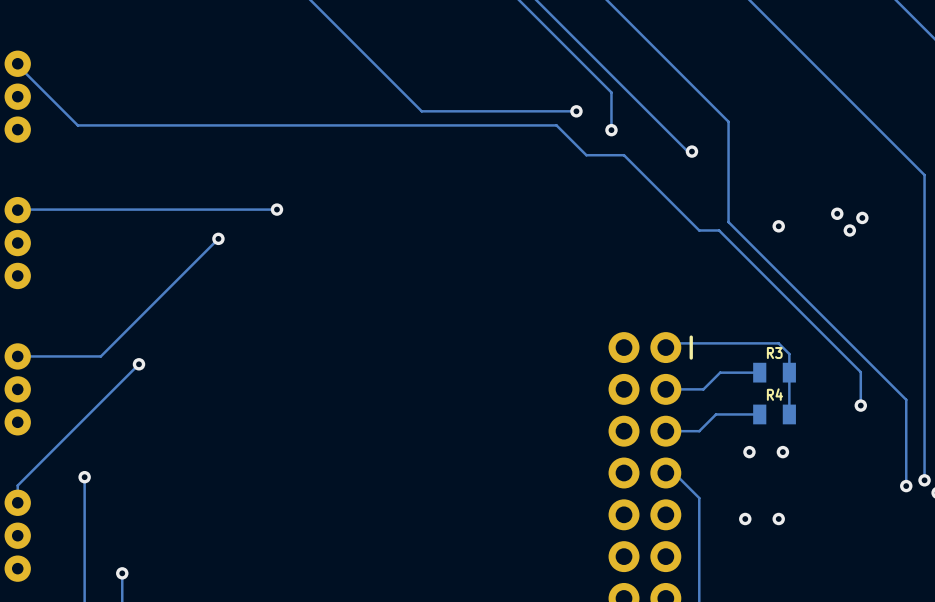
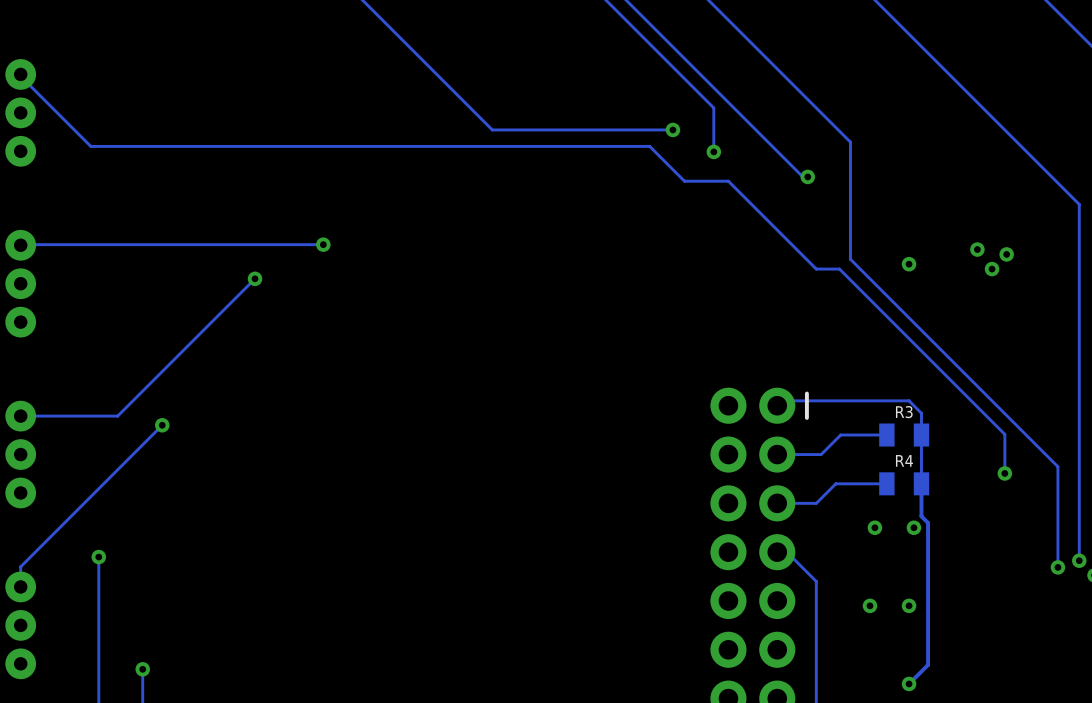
track: none -> (921, 483) (921, 516) (928, 522) (928, 664) (909, 683)
via: none -> (909, 683)

